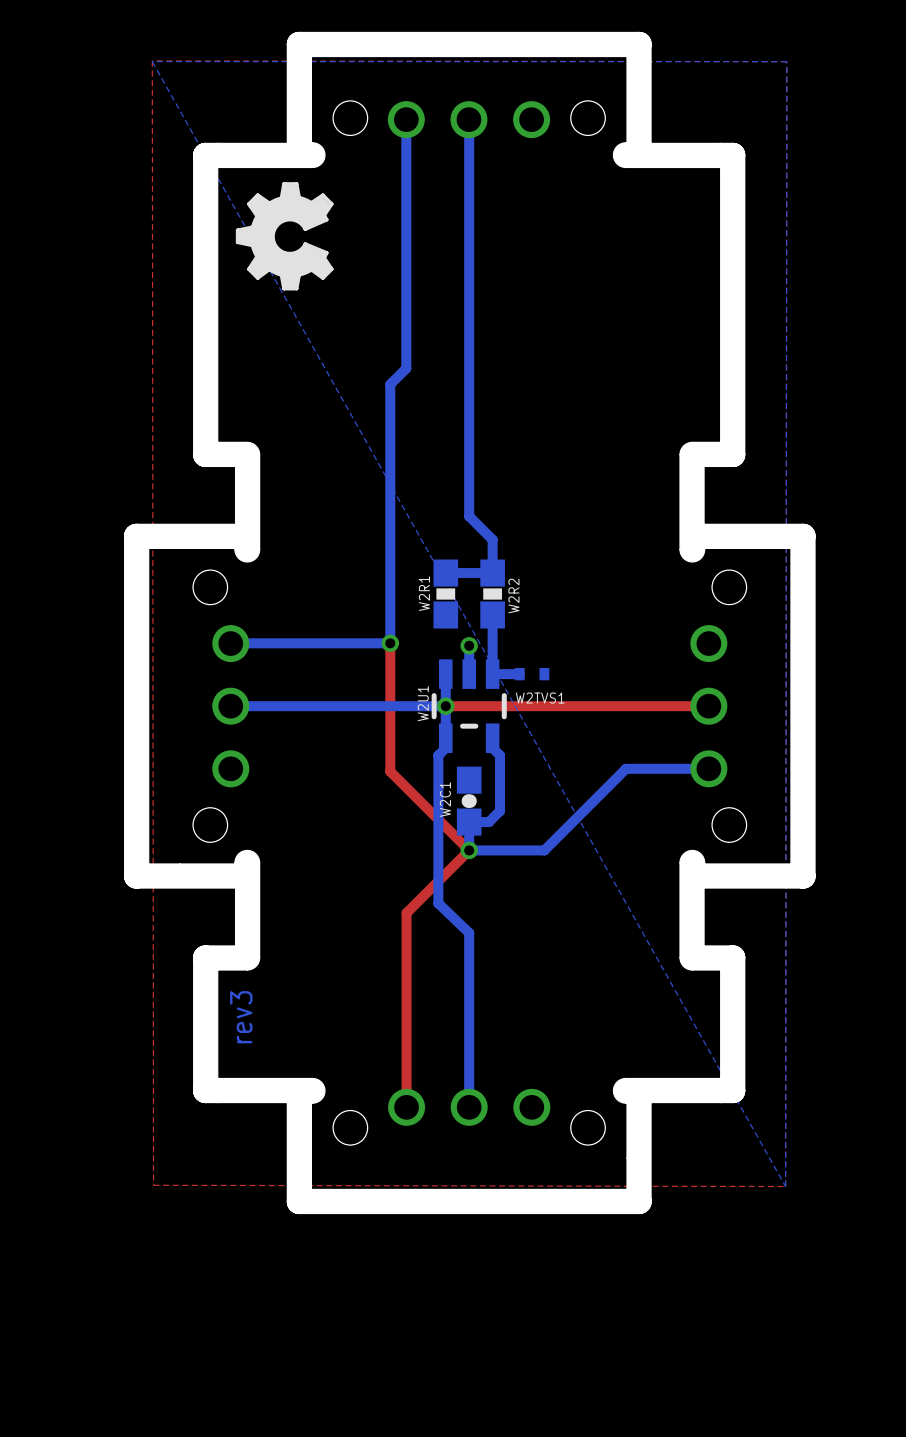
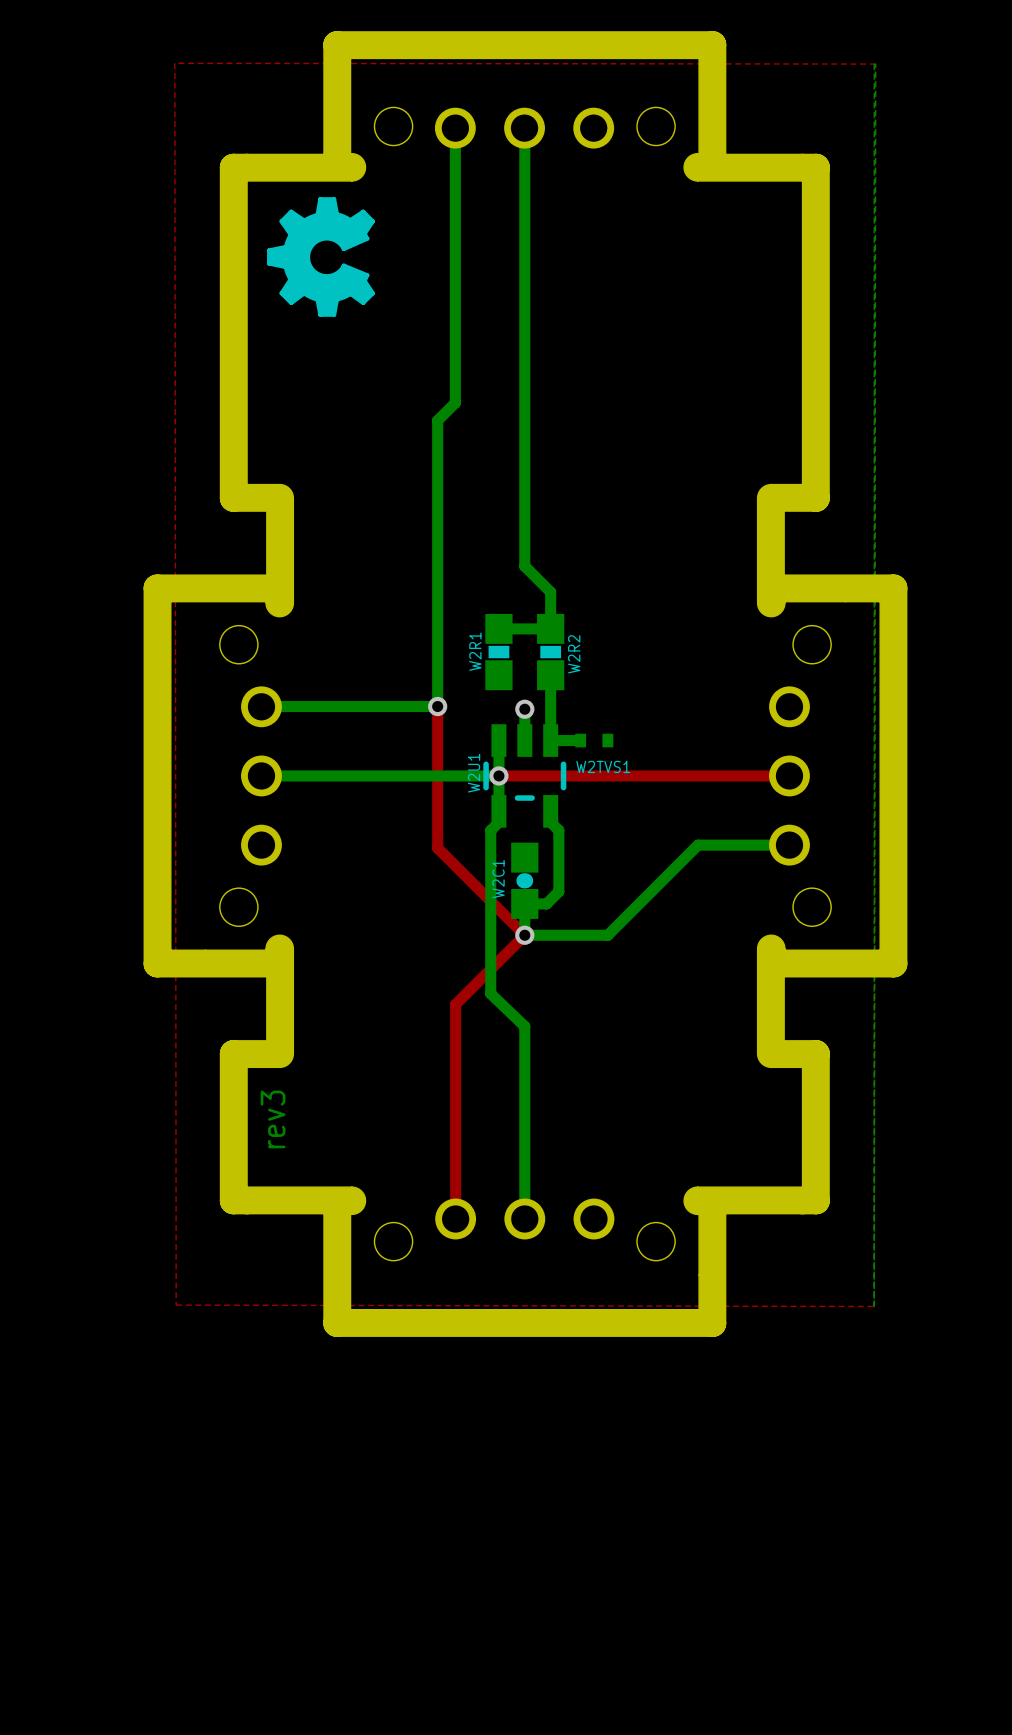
bottom zone outline: (785, 61) (152, 61) (785, 1186) -> (874, 64) (874, 1306)

